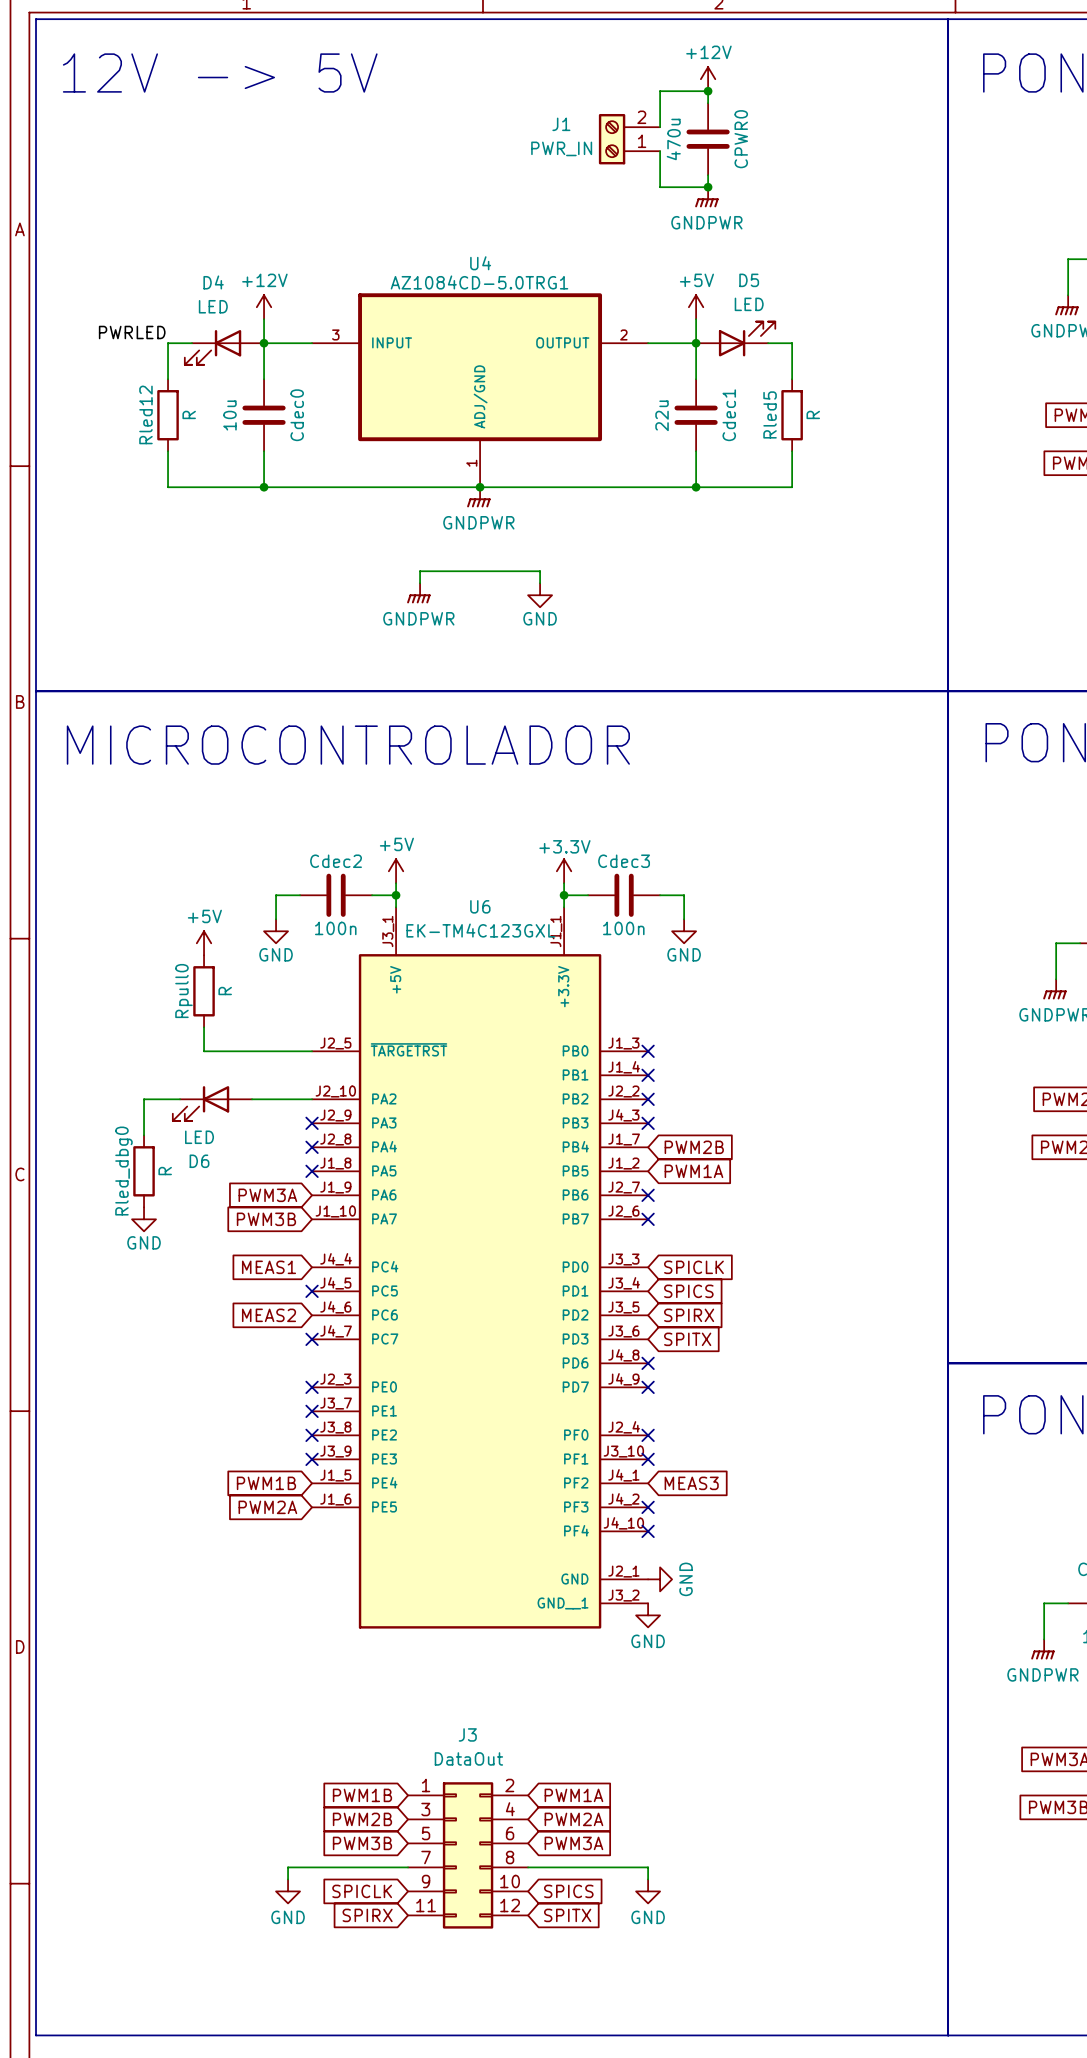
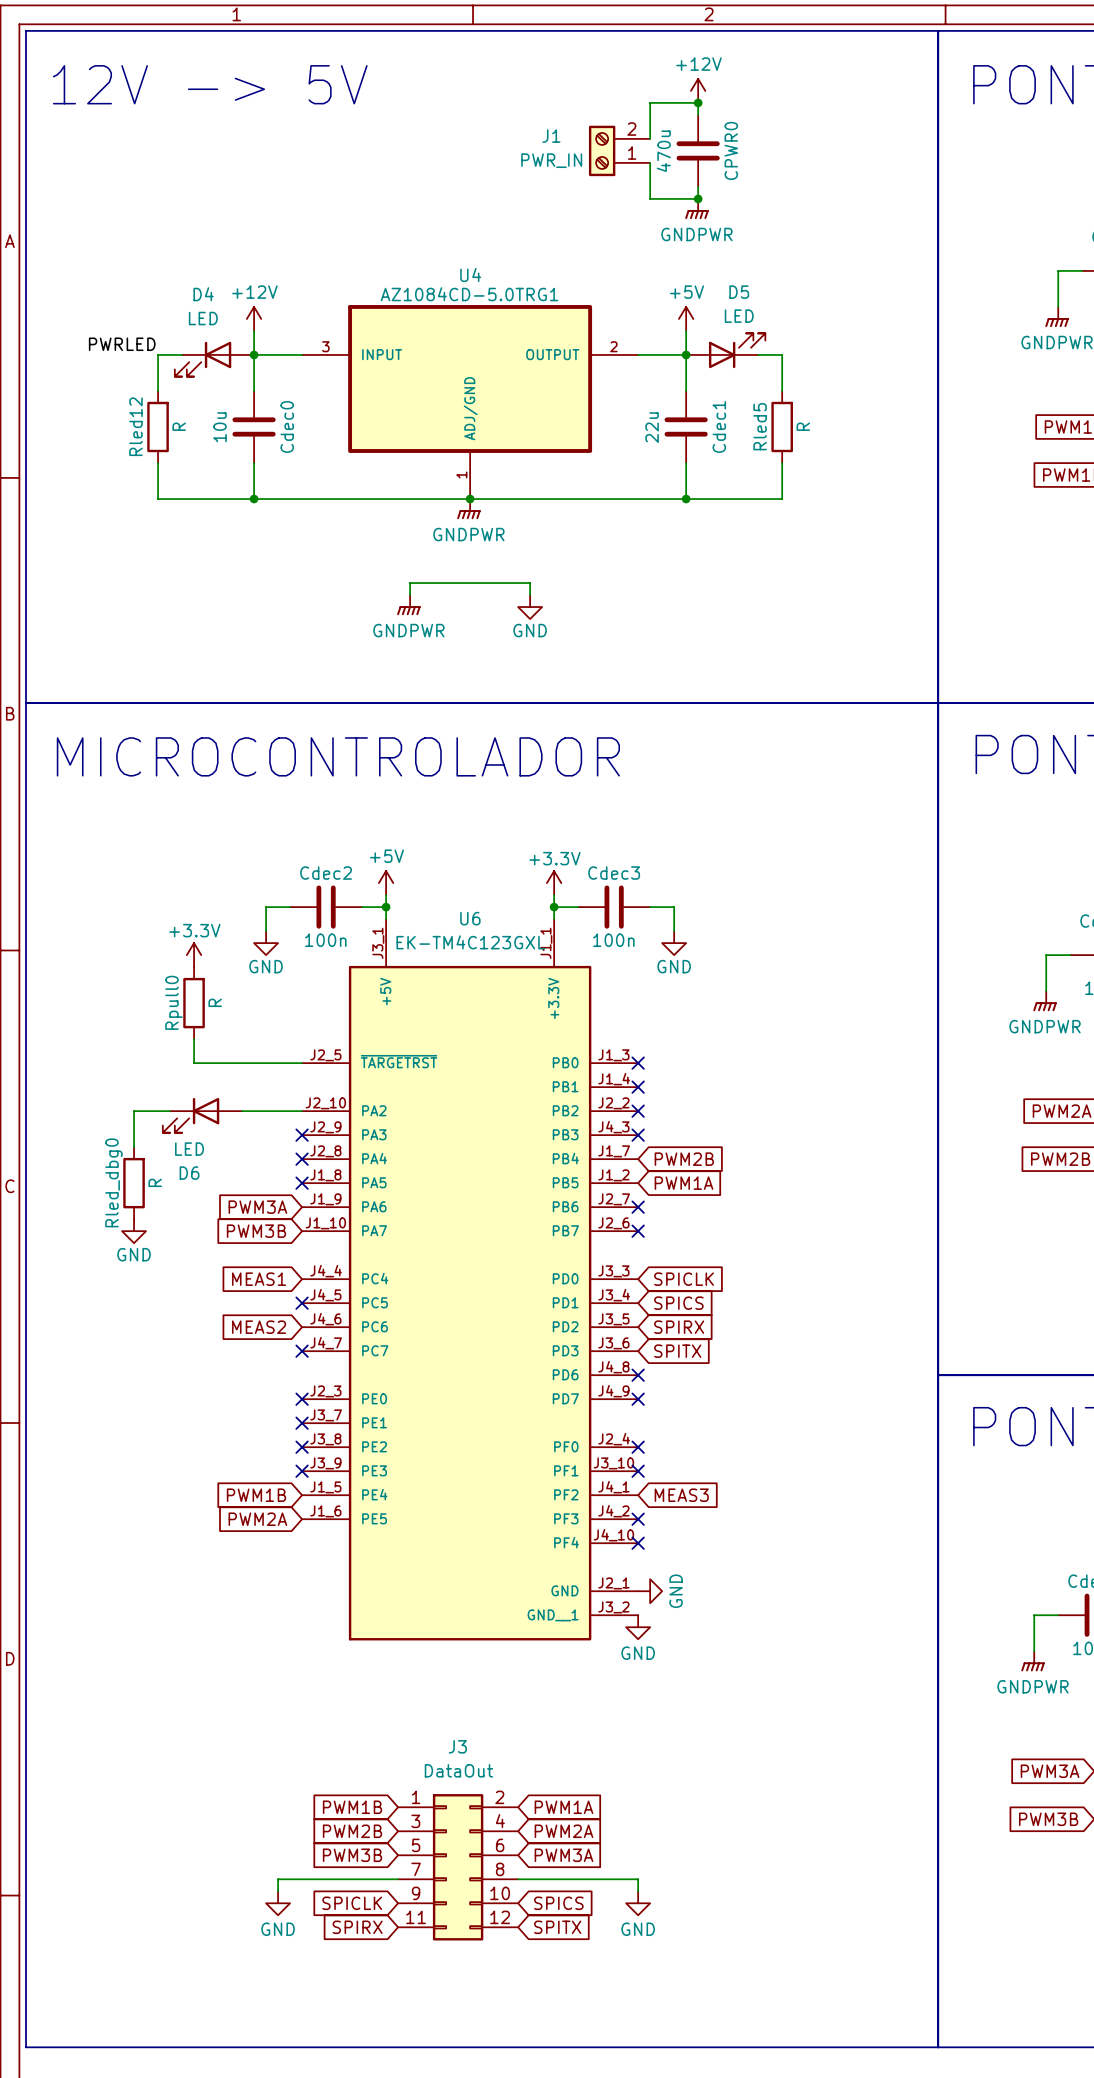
power symbol: +5V (204, 943) -> +3.3V (194, 955)

